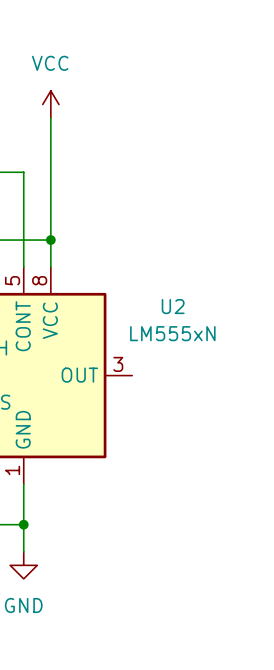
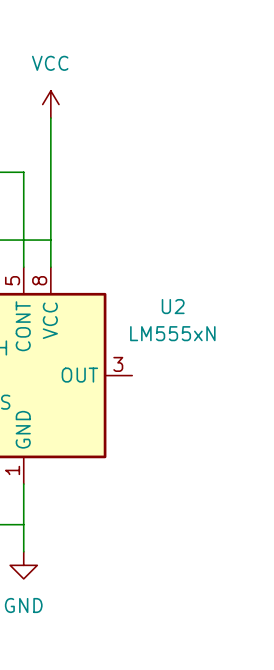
junction: (50, 240) -> none
junction: (23, 524) -> none

